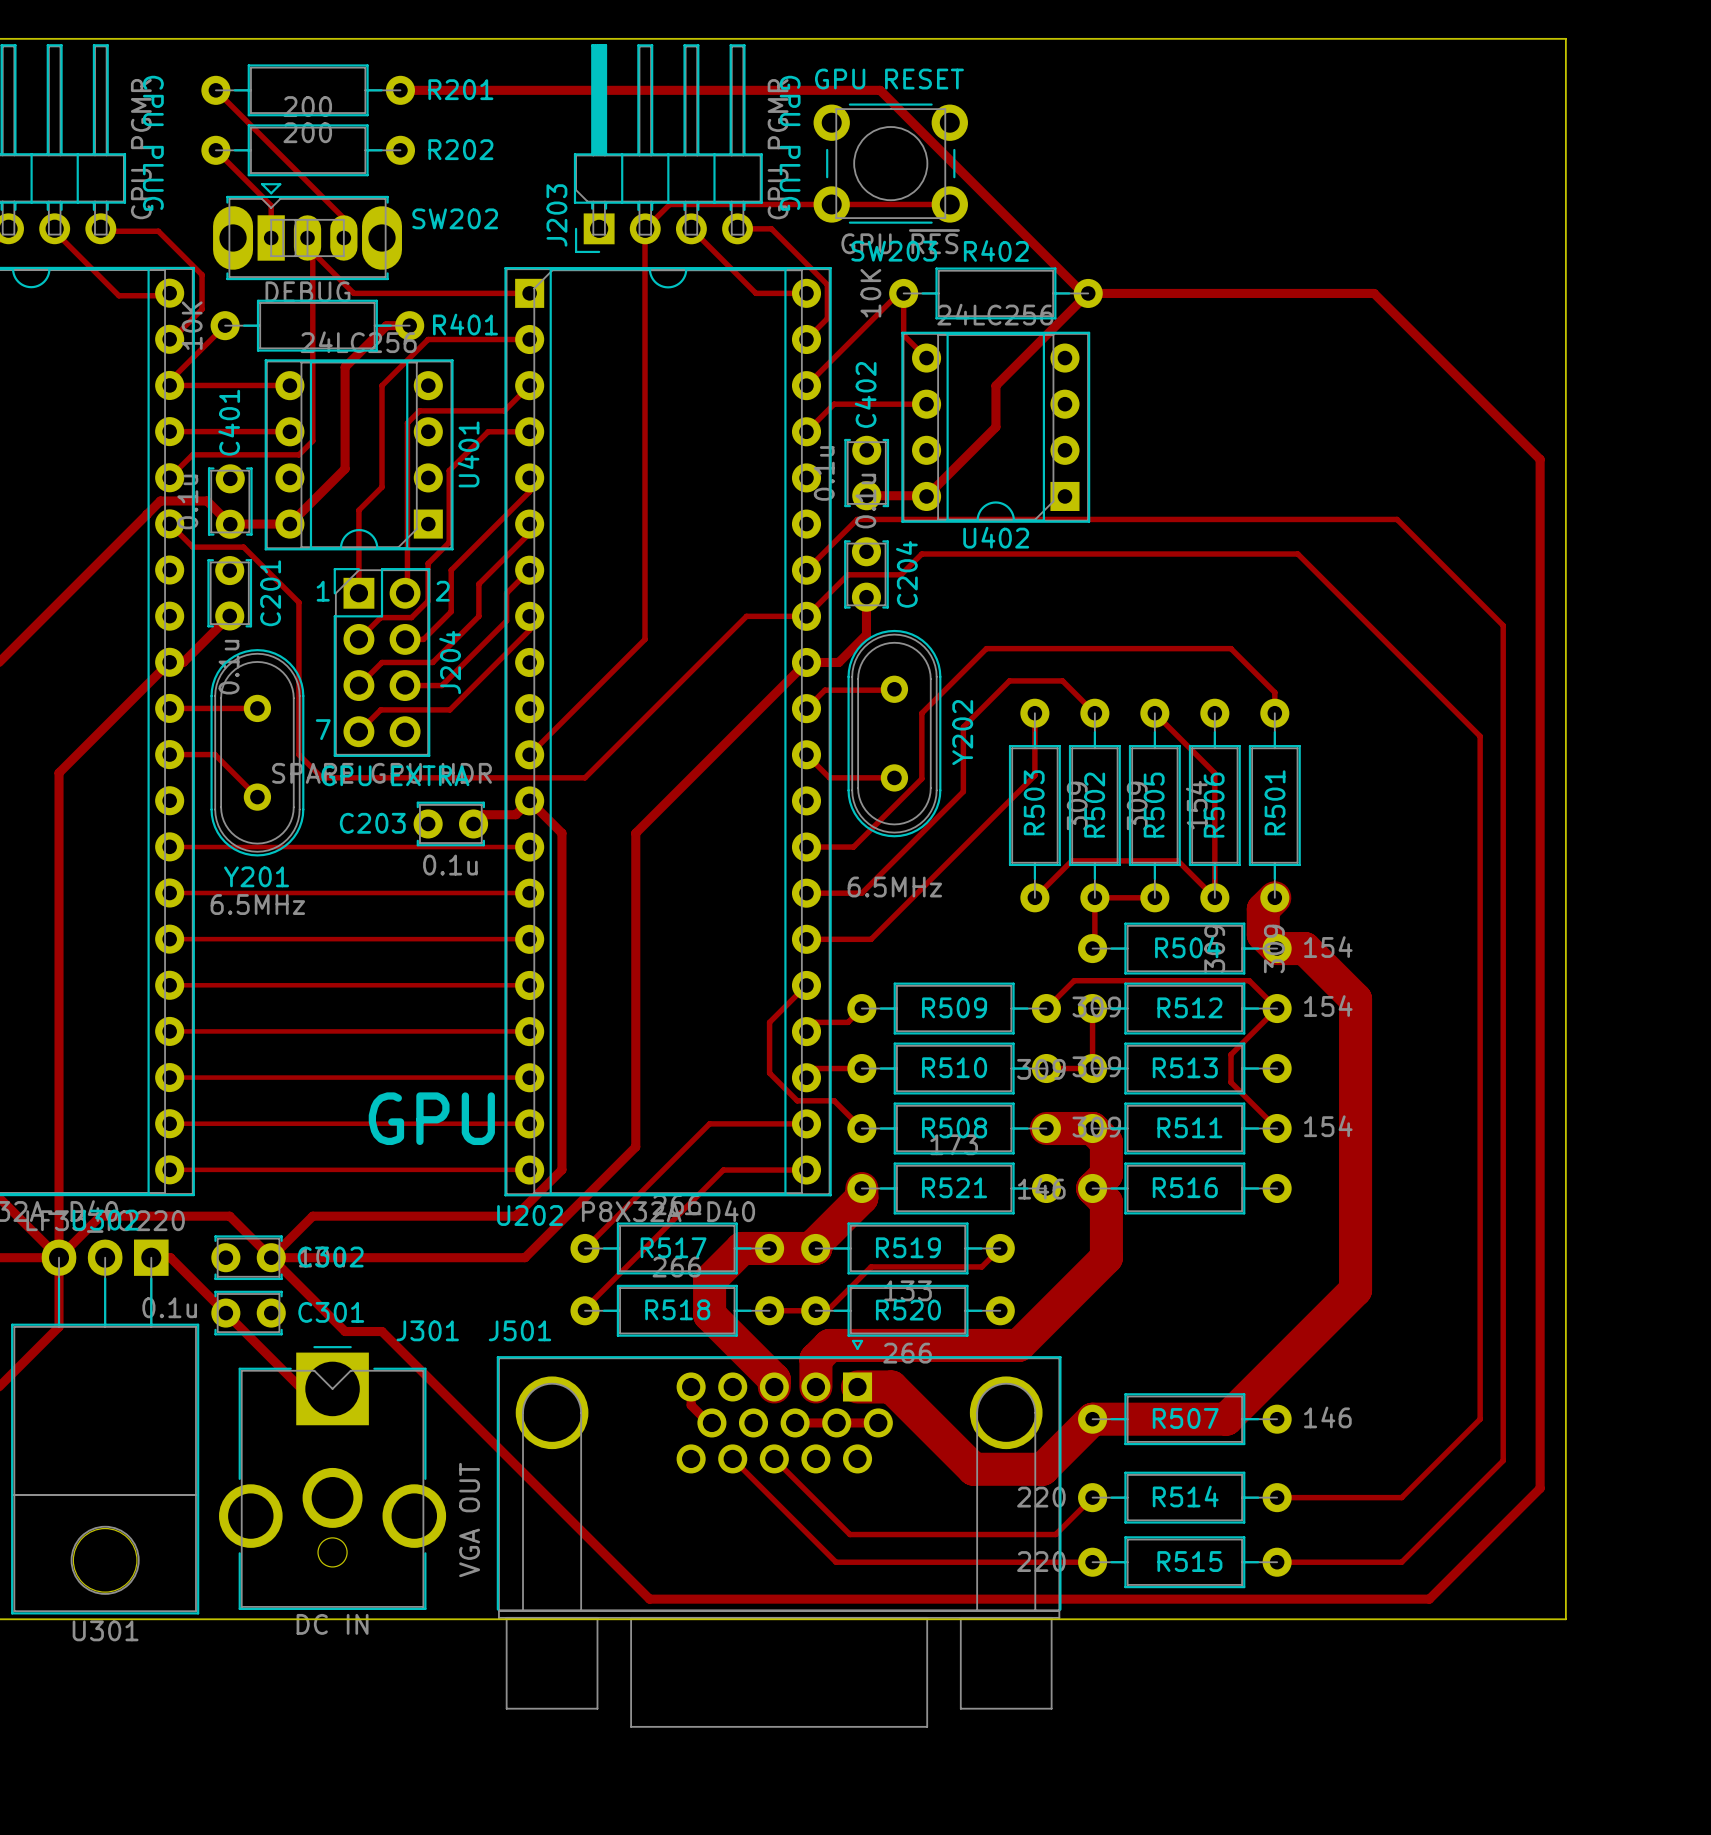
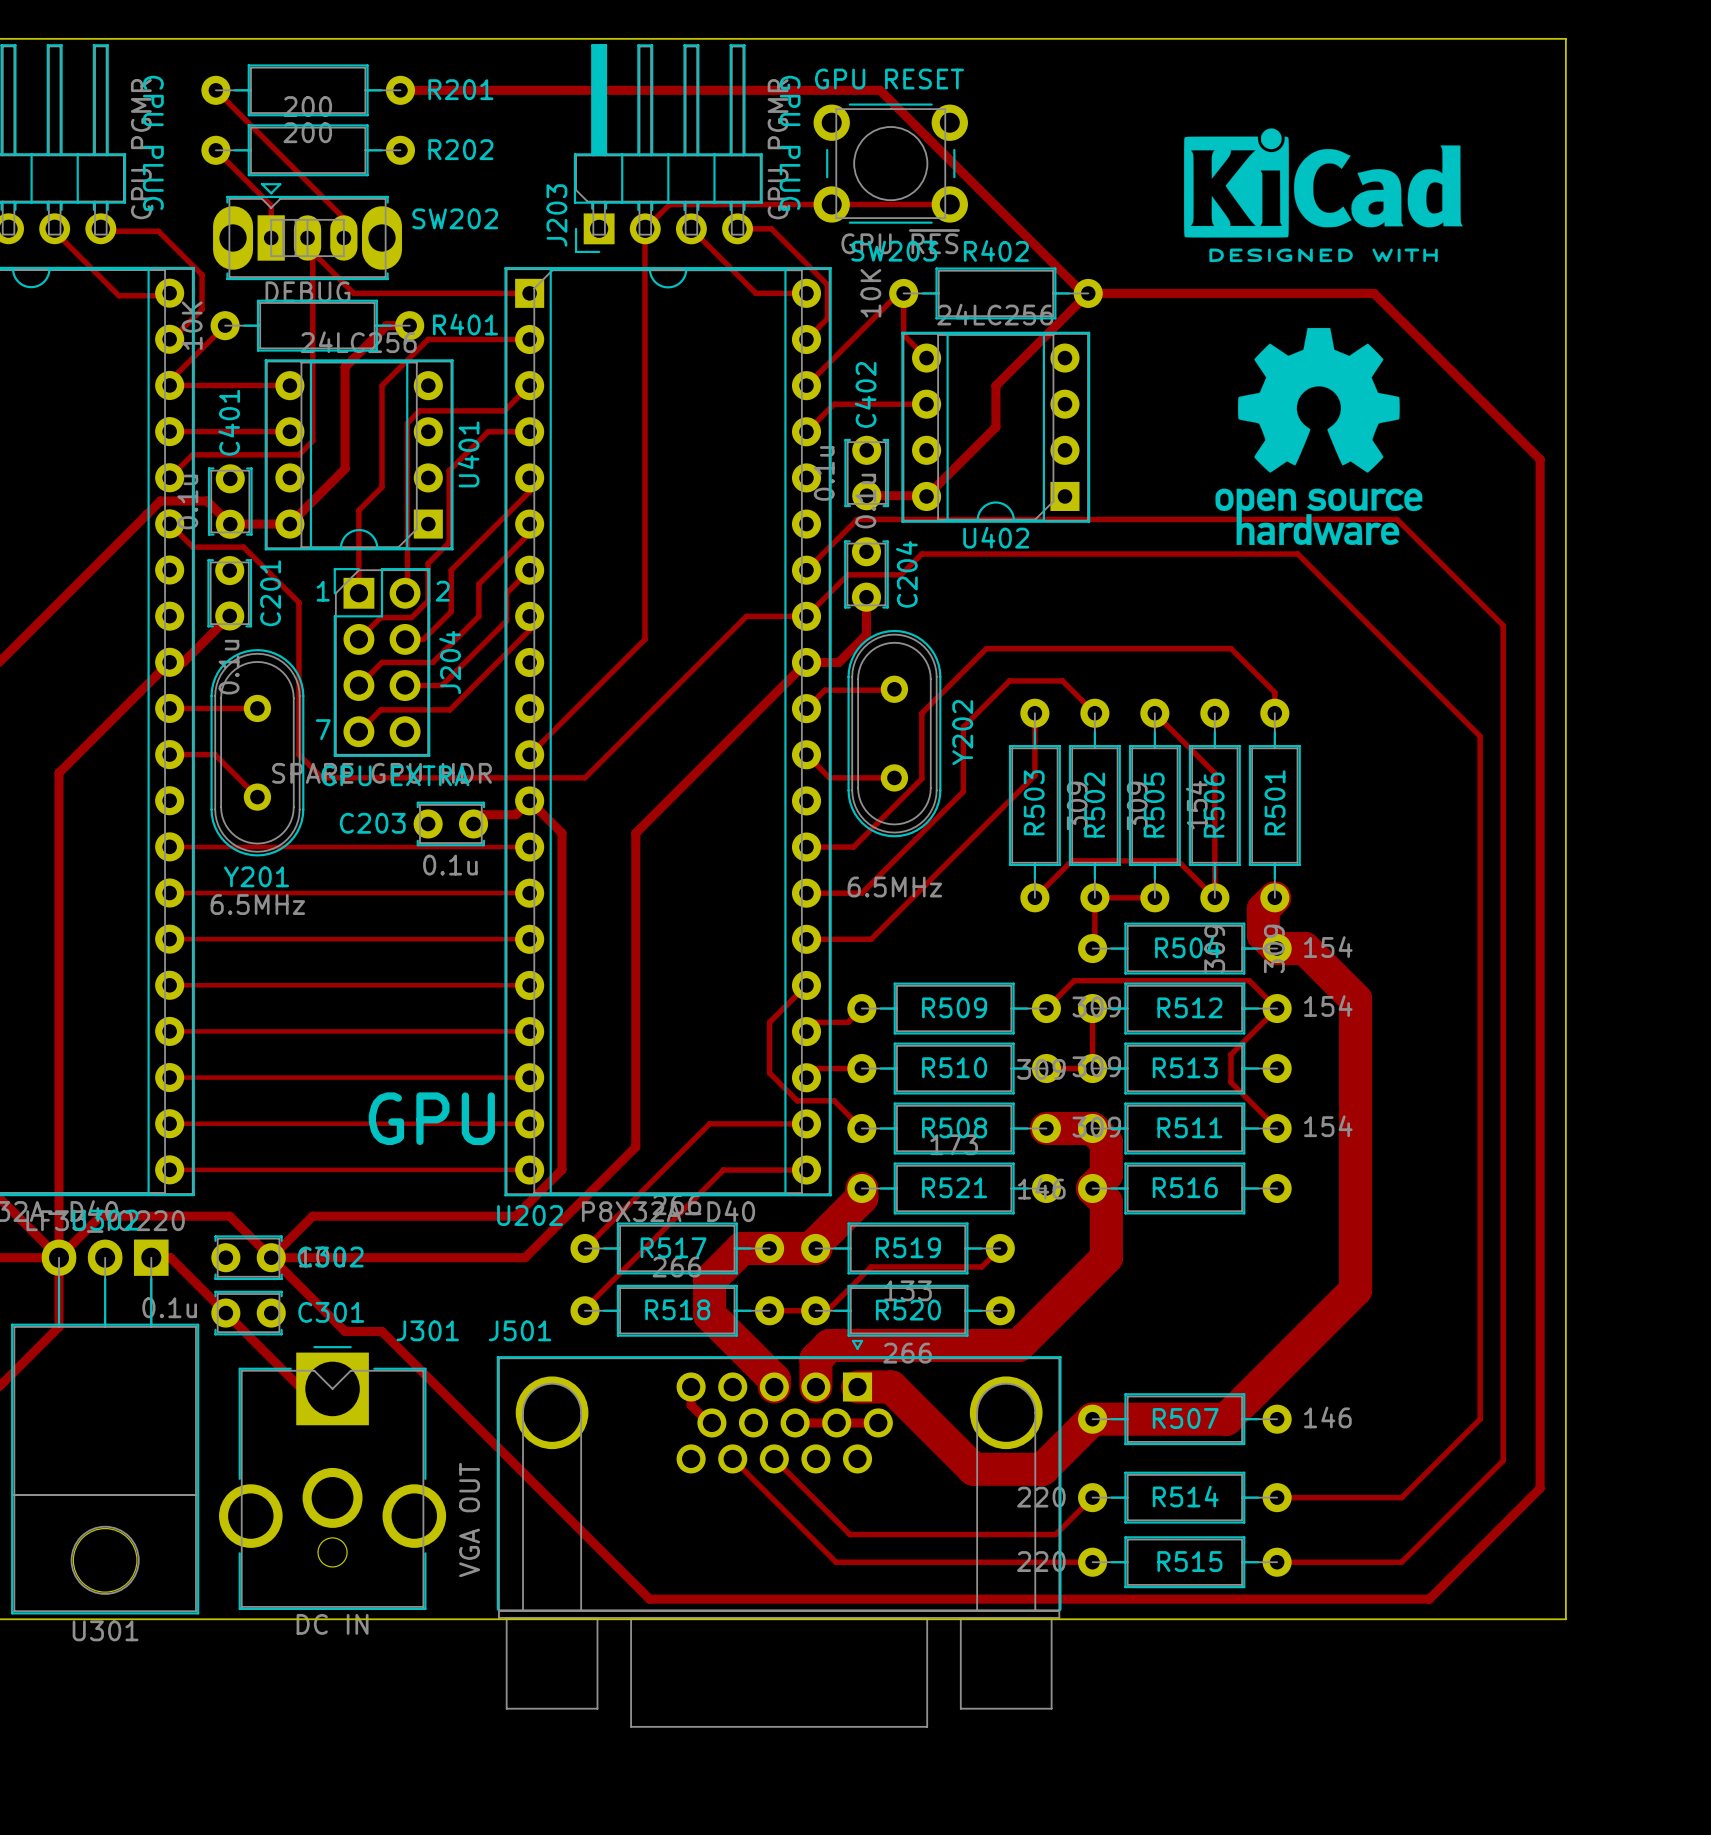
drawing: none -> [1184, 128, 1463, 263]
drawing: none -> [1215, 327, 1423, 546]

